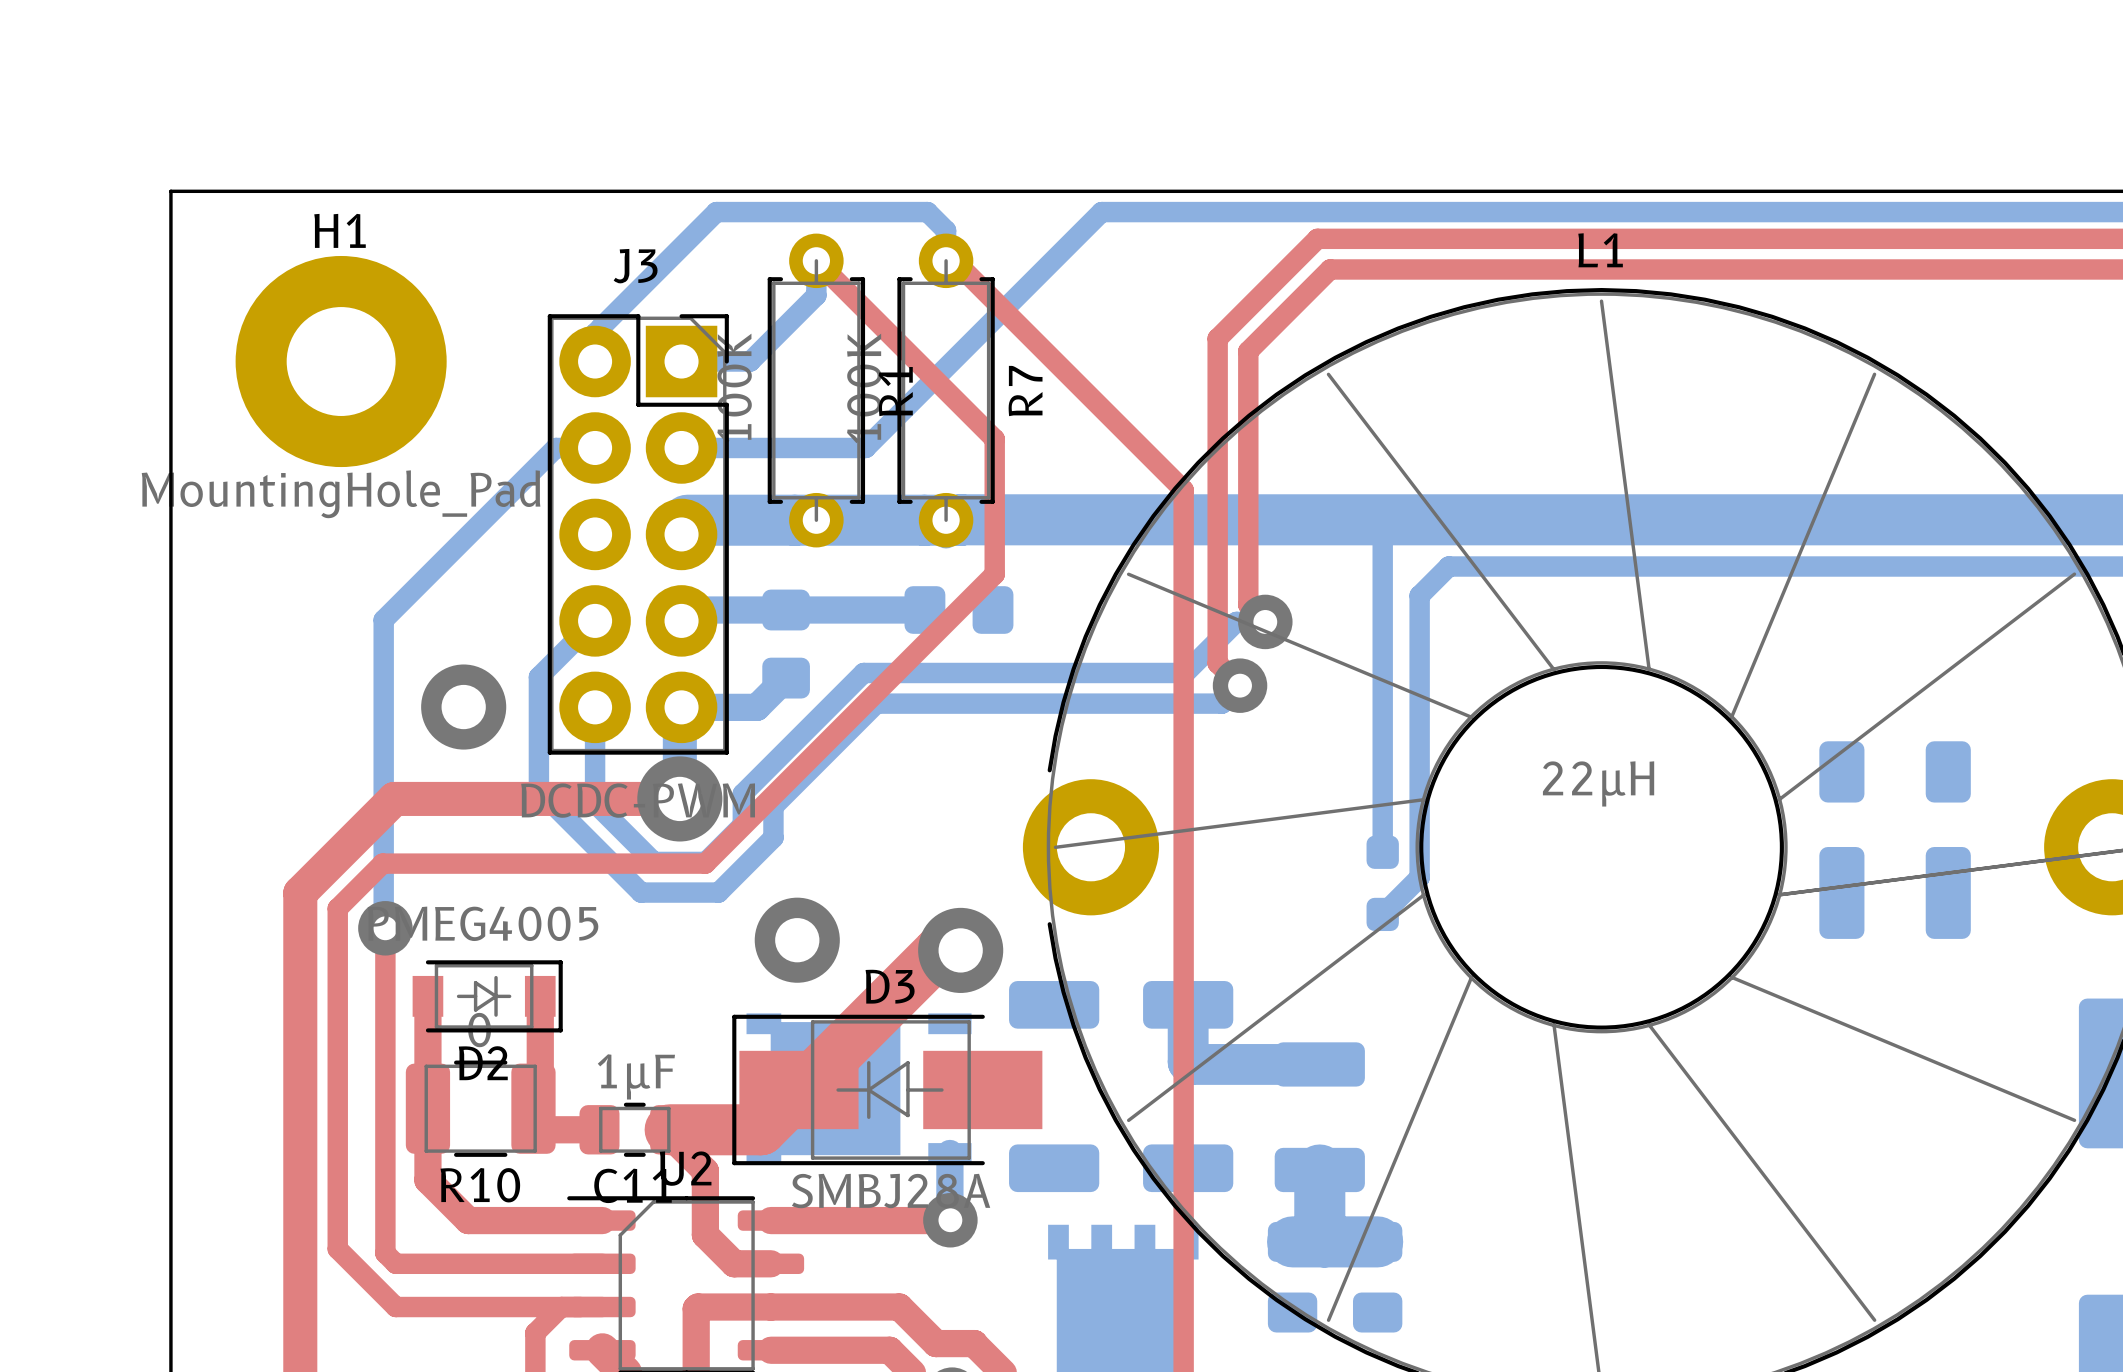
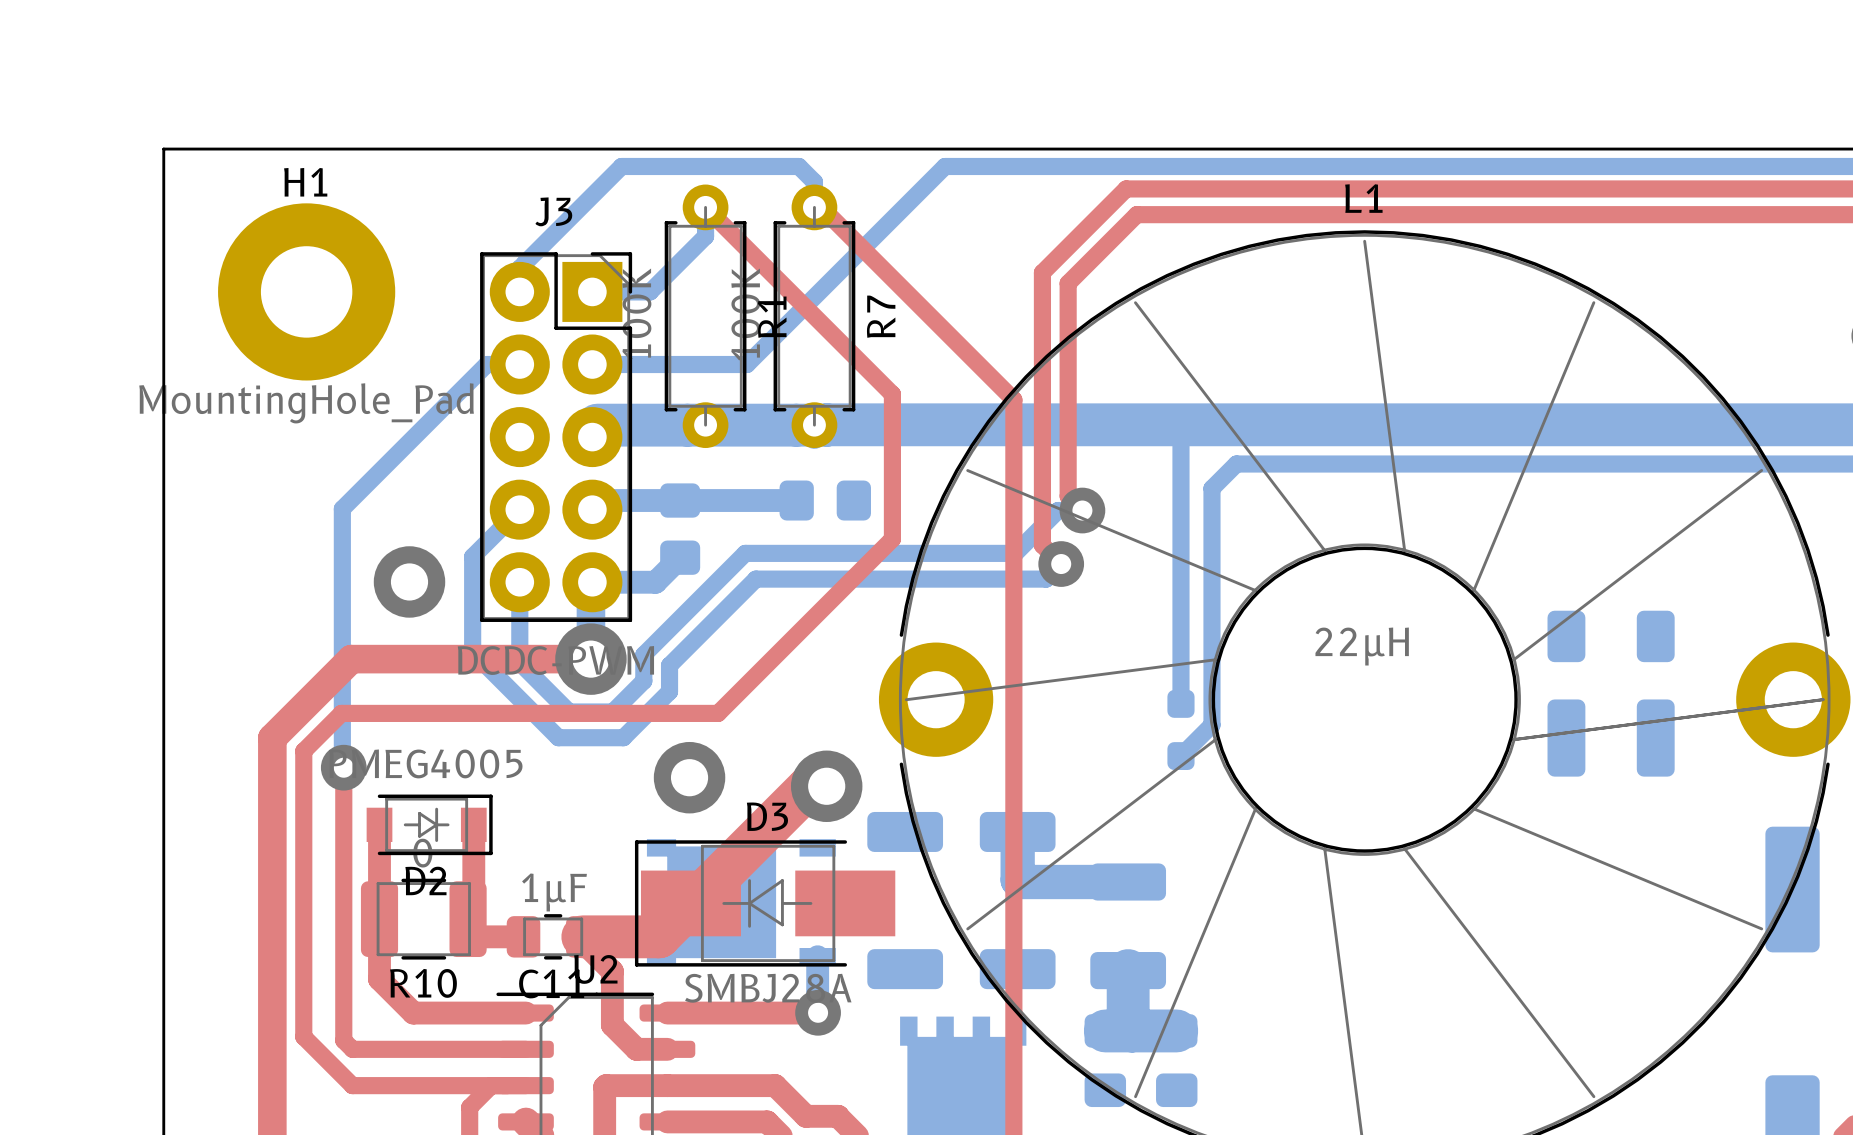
top track: (994, 439) (994, 574) (705, 863) -> (855, 357) (892, 394) (892, 539) (718, 713) (612, 713)

